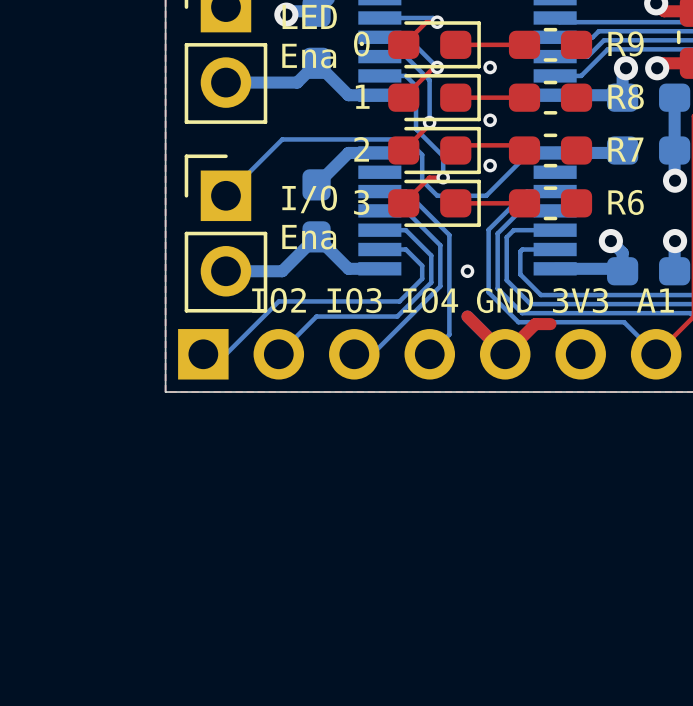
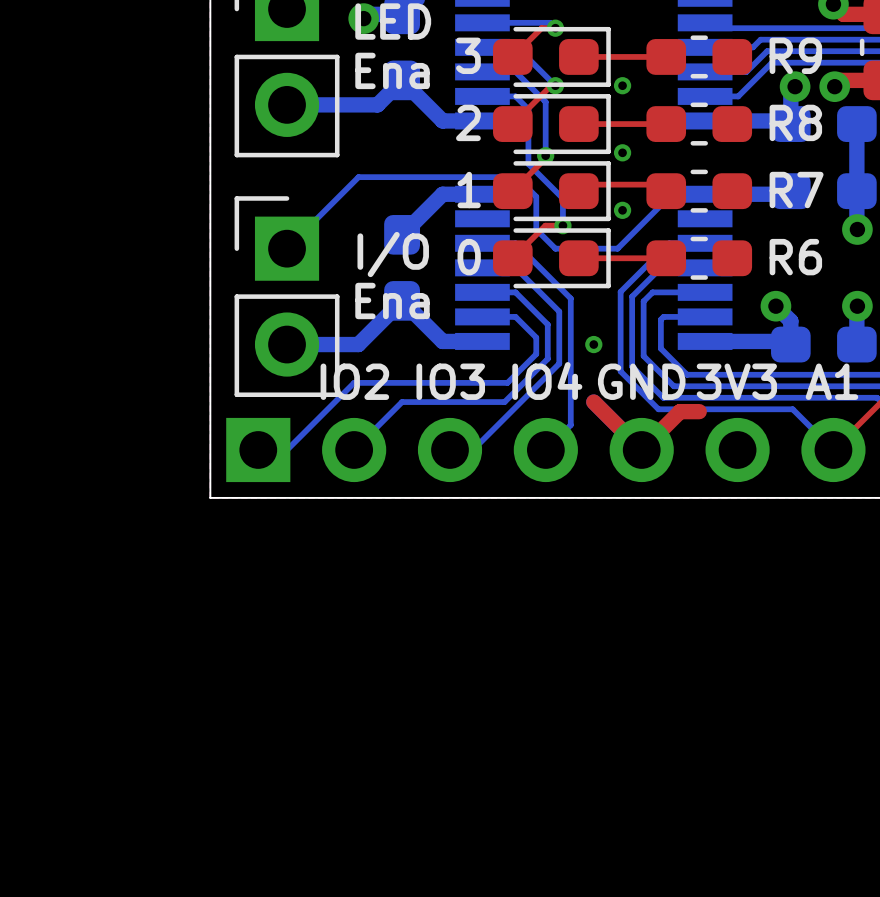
text: 0 (361, 43) -> 3 (468, 55)
text: 1 (362, 96) -> 2 (468, 122)
text: 2 (361, 149) -> 1 (469, 190)
text: 3 (361, 202) -> 0 (469, 257)

